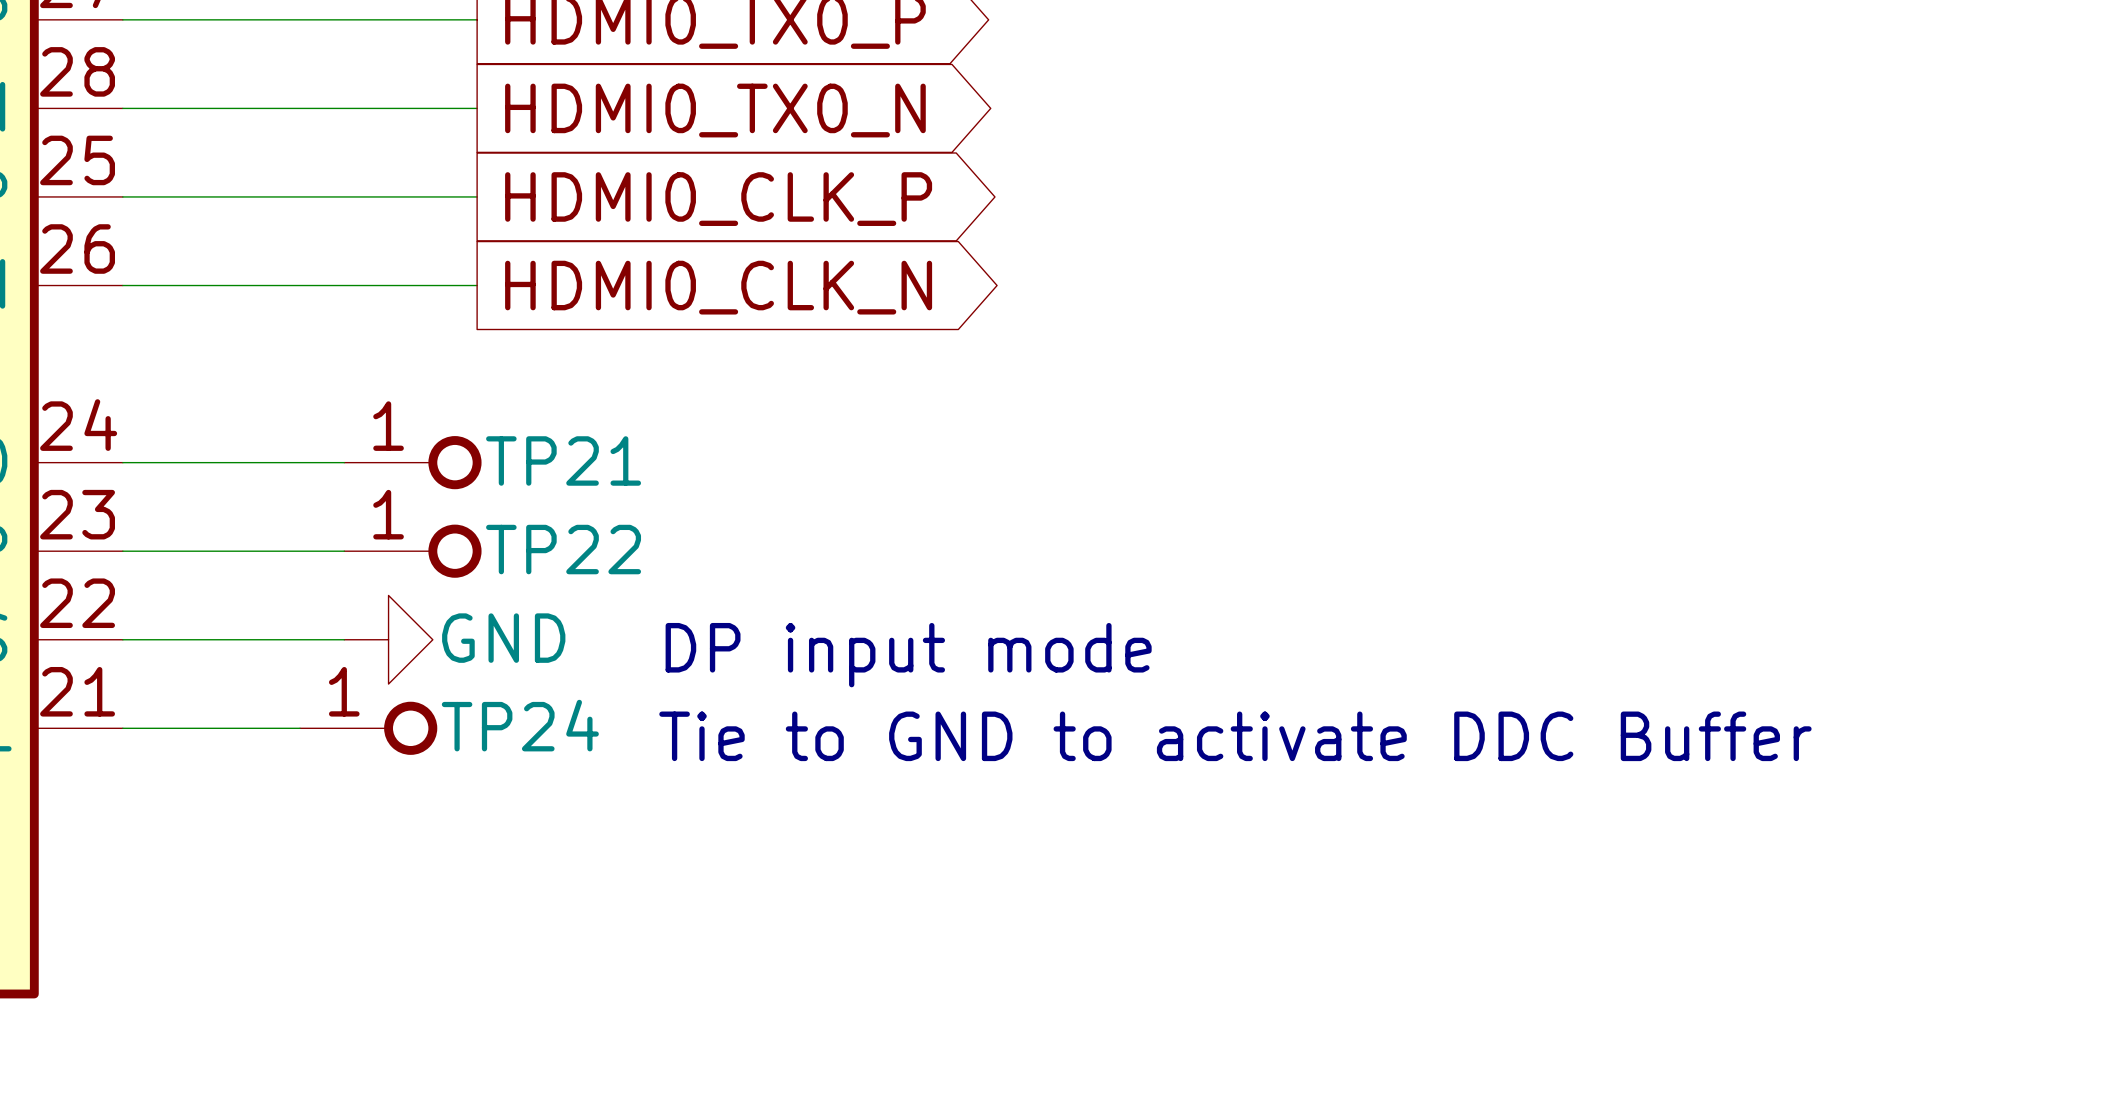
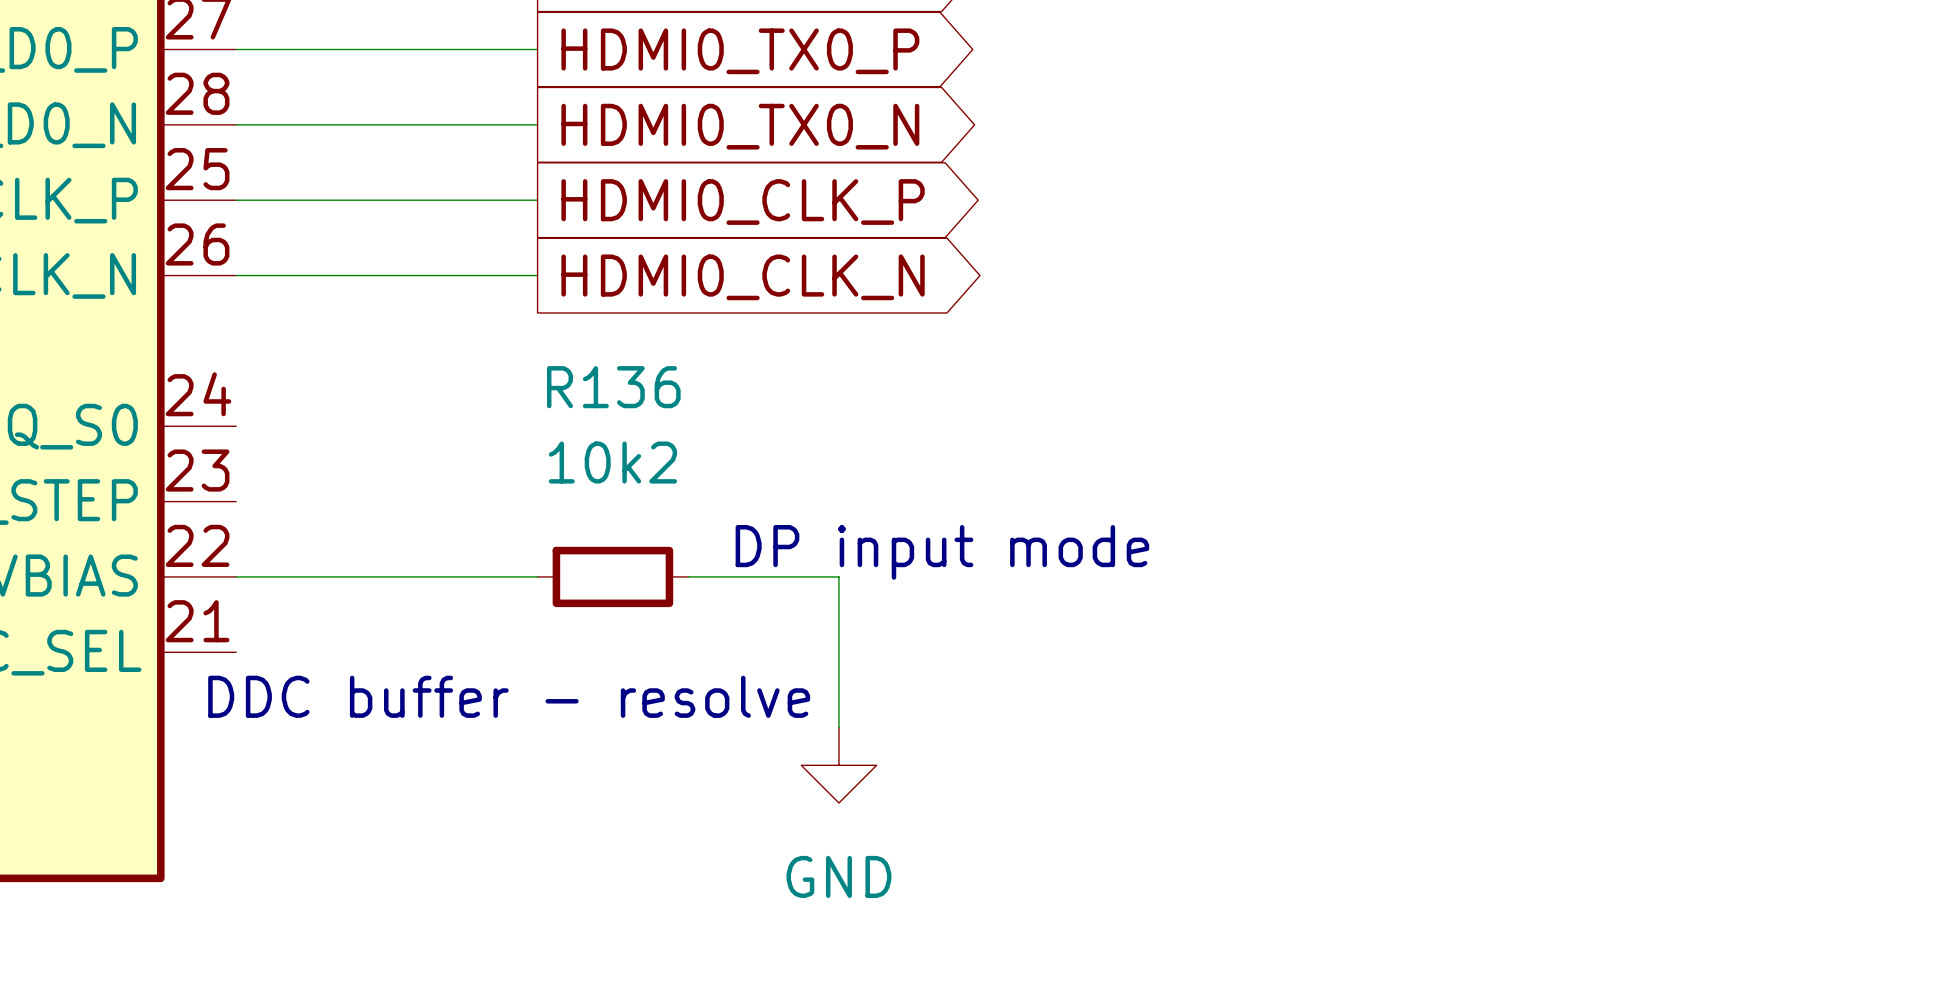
wire: (122, 462) (344, 462) -> none
TP21: (412, 462) -> none
wire: (122, 551) (344, 551) -> none
TP22: (412, 551) -> none
wire: none -> (424, 576) (537, 576)
power symbol rotation: 0° (388, 639) -> 90° clockwise (838, 765)
power symbol position: GND (388, 639) -> GND (838, 765)
R136: none -> (612, 576)
wire: none -> (688, 576) (838, 576) (838, 727)
text position: DP input mode (908, 655) -> DP input mode (942, 552)
wire: (122, 728) (300, 728) -> none
TP24: (368, 728) -> none
text: Tie to GND to activate DDC Buffer (1235, 736) -> none
text: none -> DDC buffer - resolve (509, 696)

